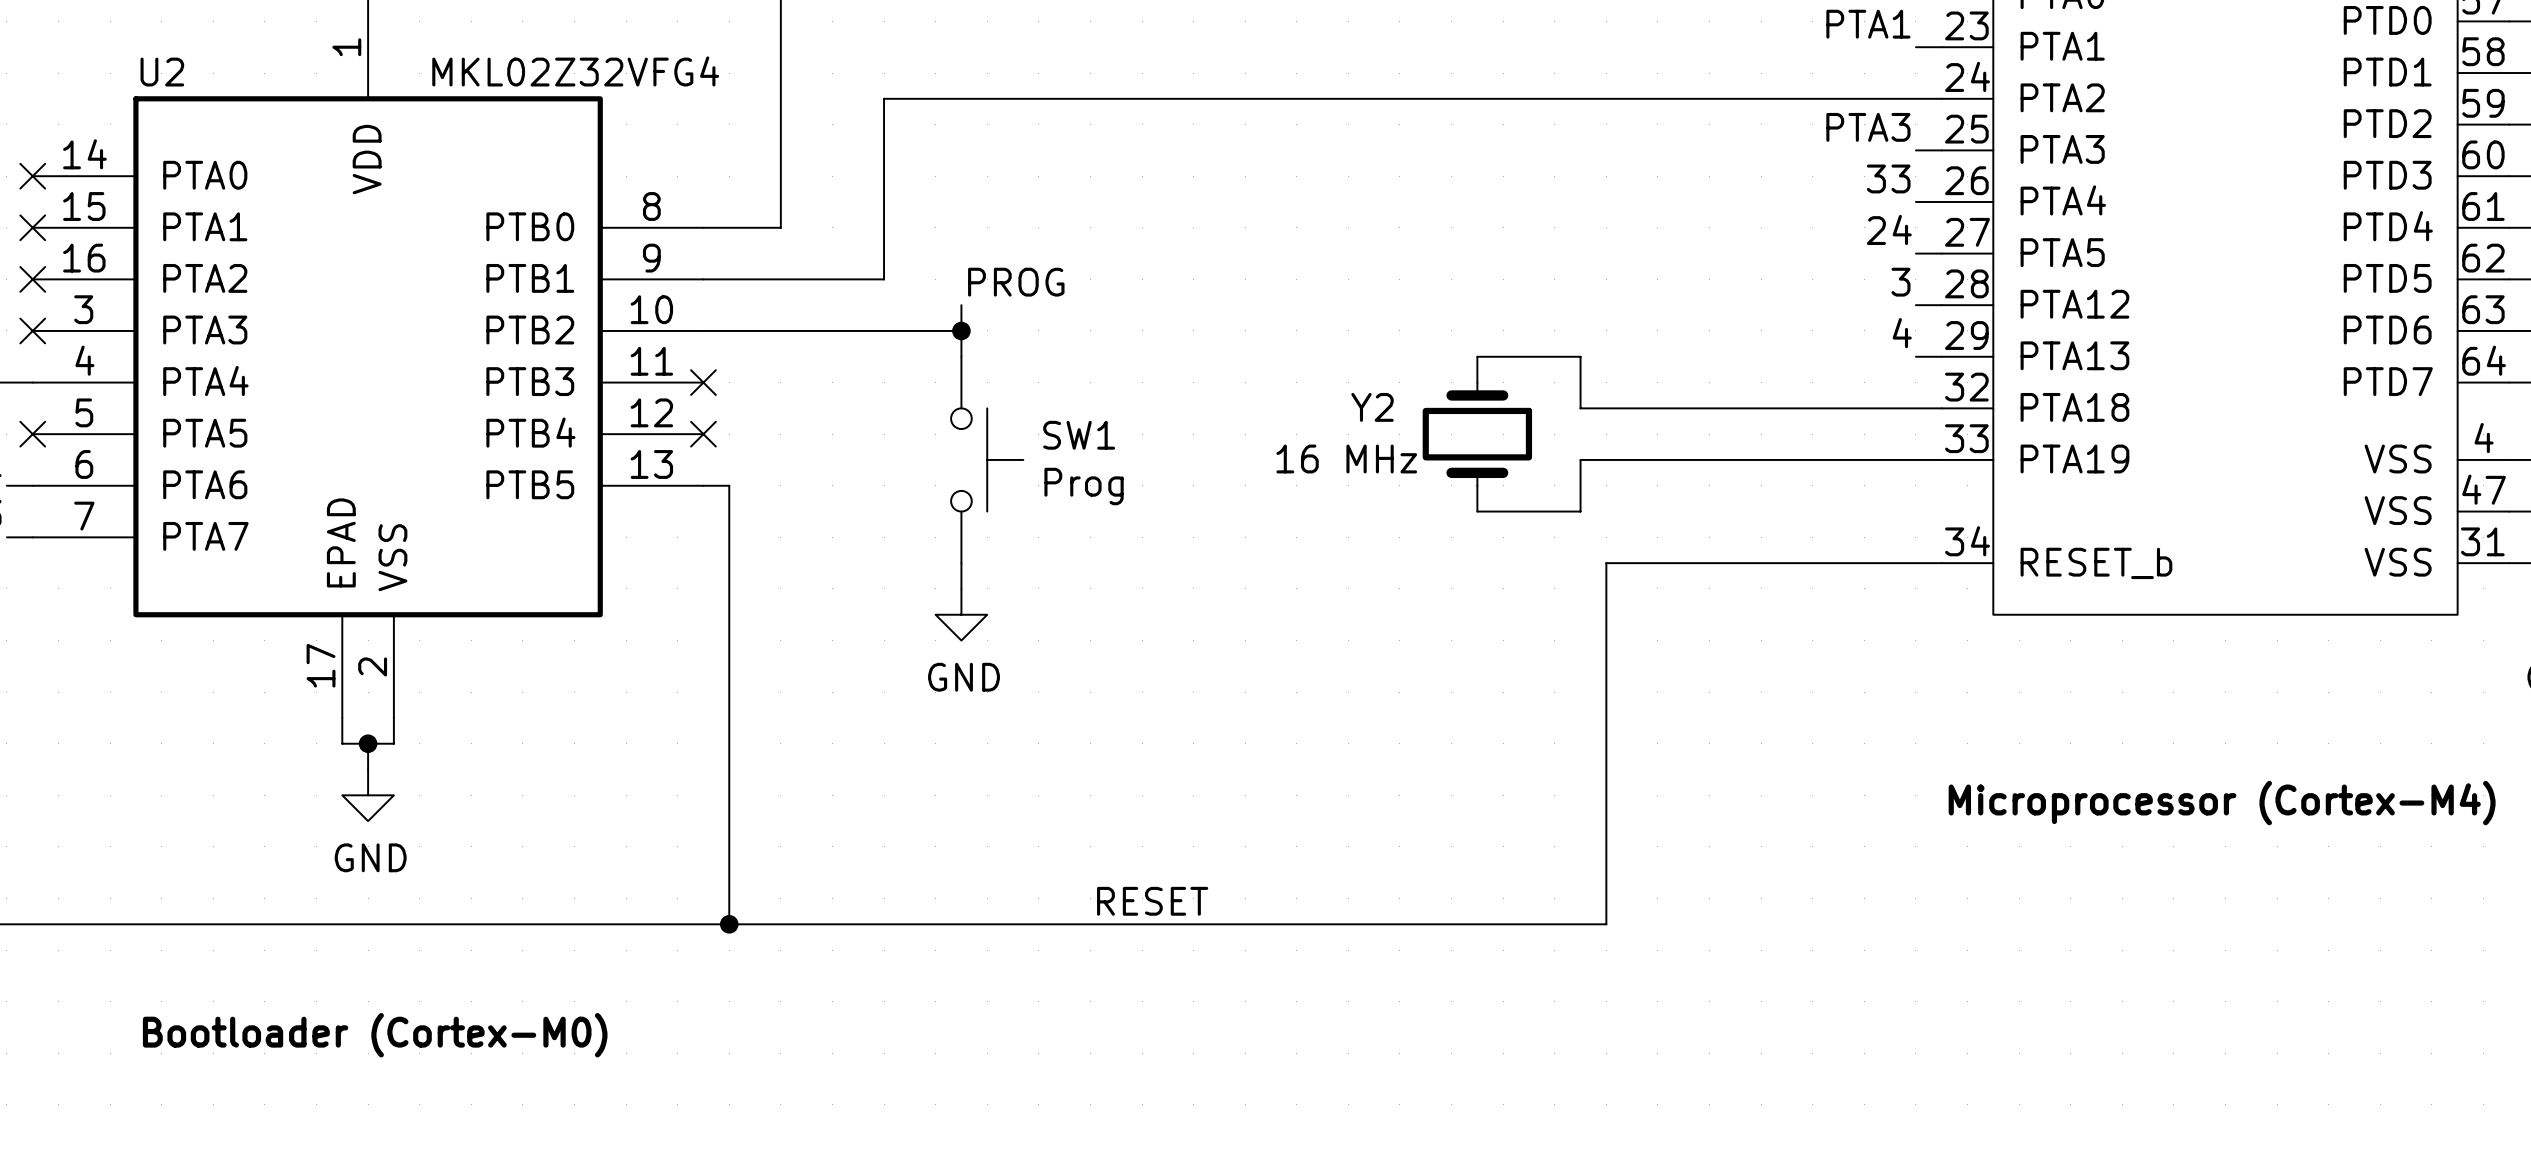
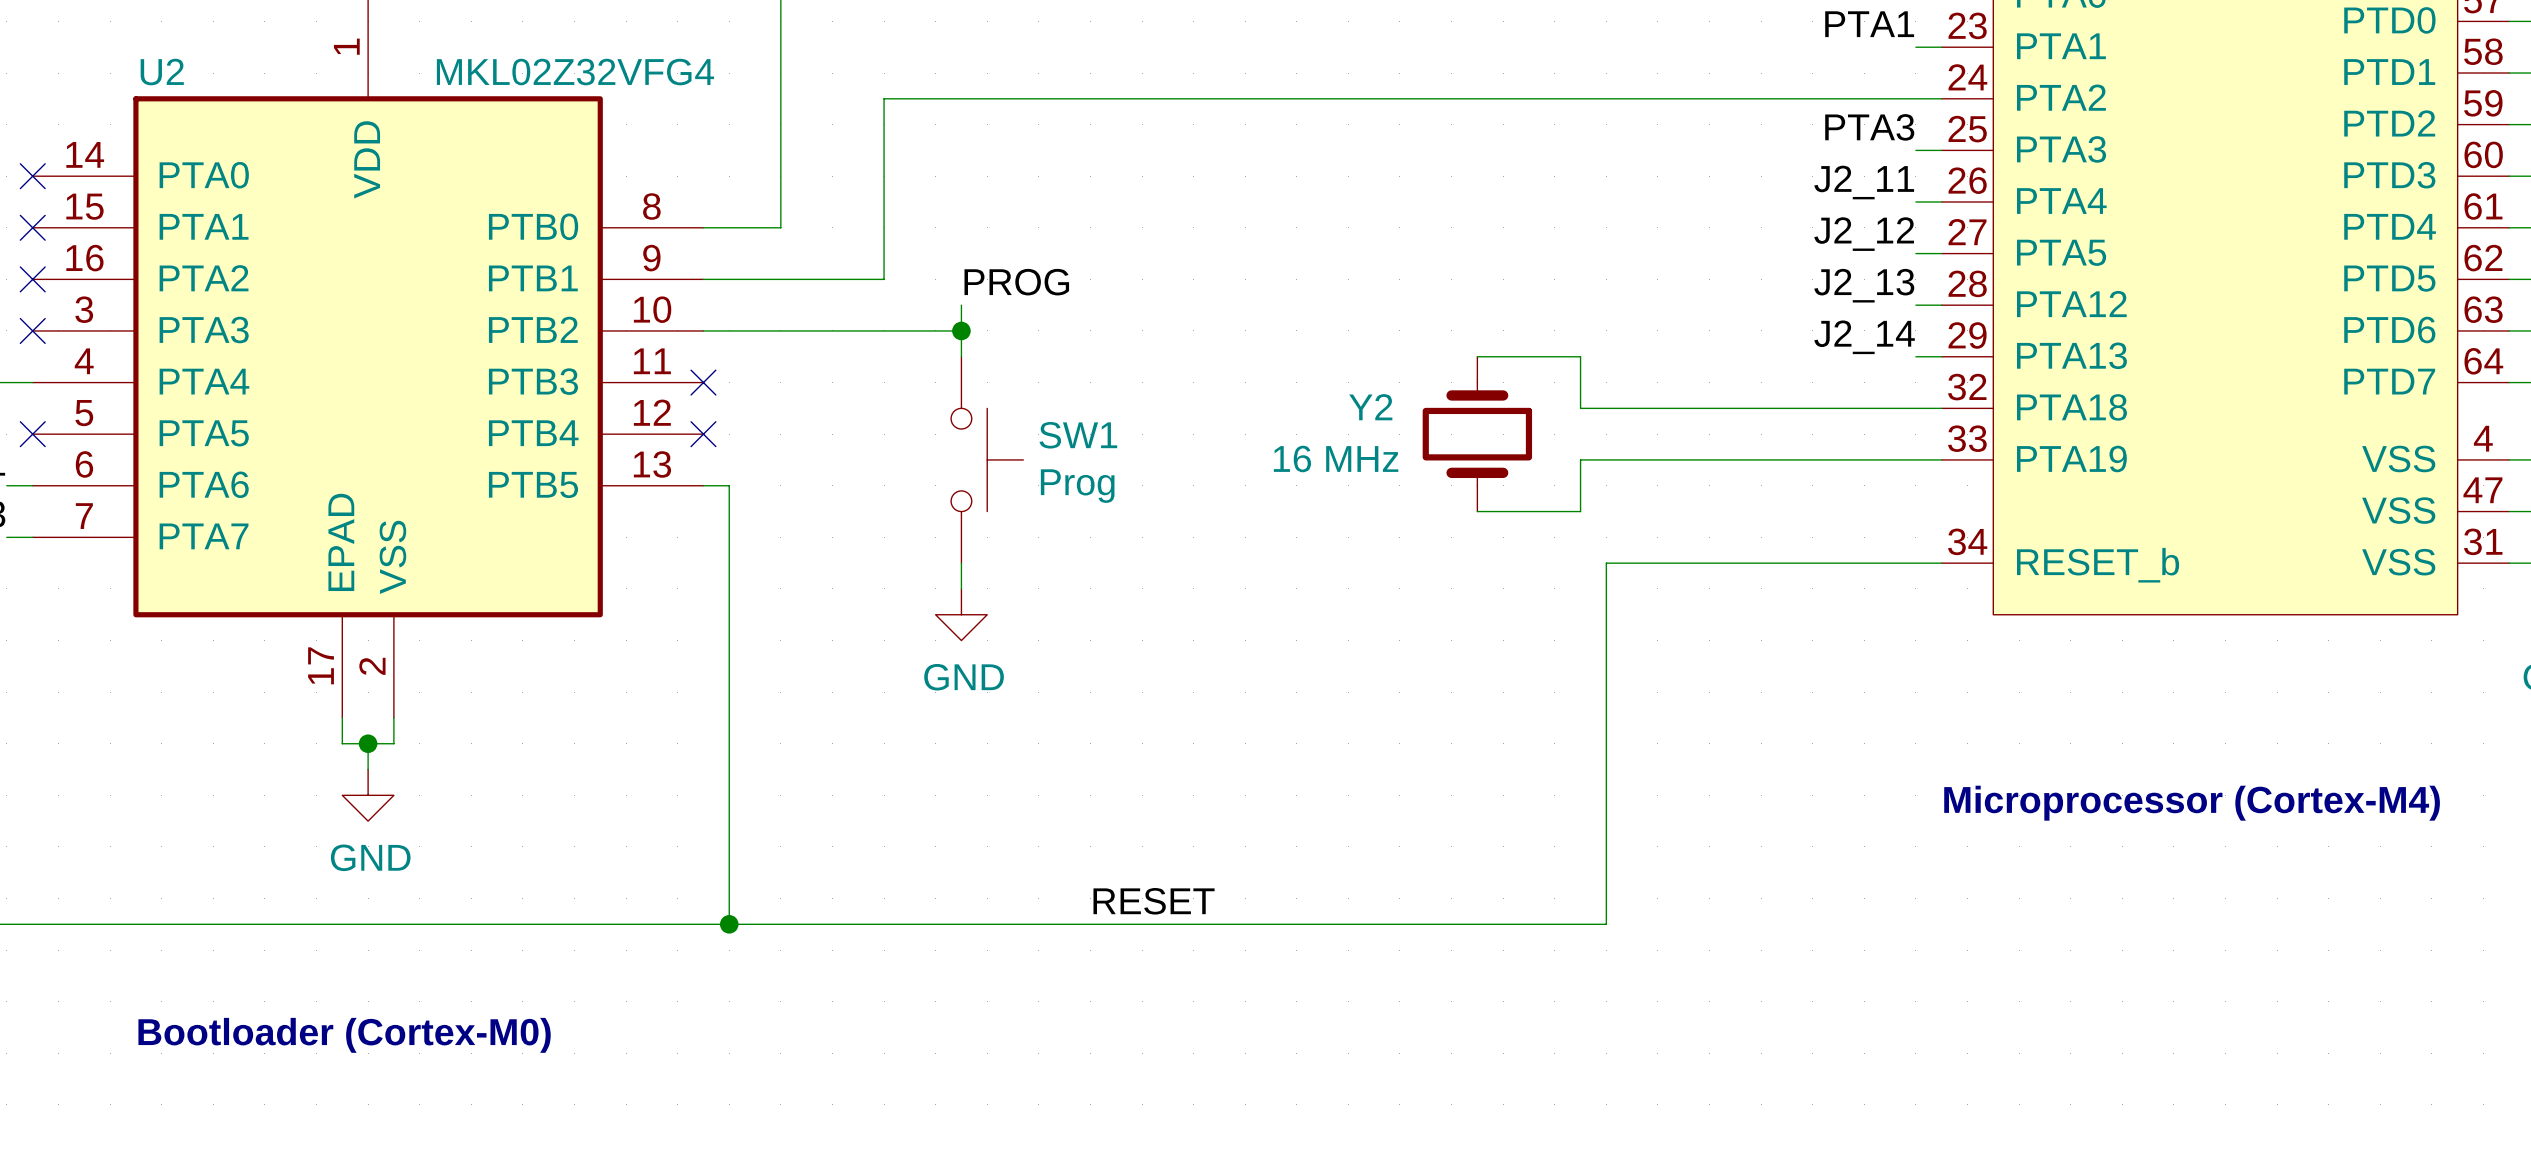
label: 33 (1888, 178) -> J2_11 (1864, 182)
label: 24 (1889, 229) -> J2_12 (1864, 234)
label: 3 (1900, 282) -> J2_13 (1864, 285)
label: 4 (1902, 333) -> J2_14 (1864, 337)

